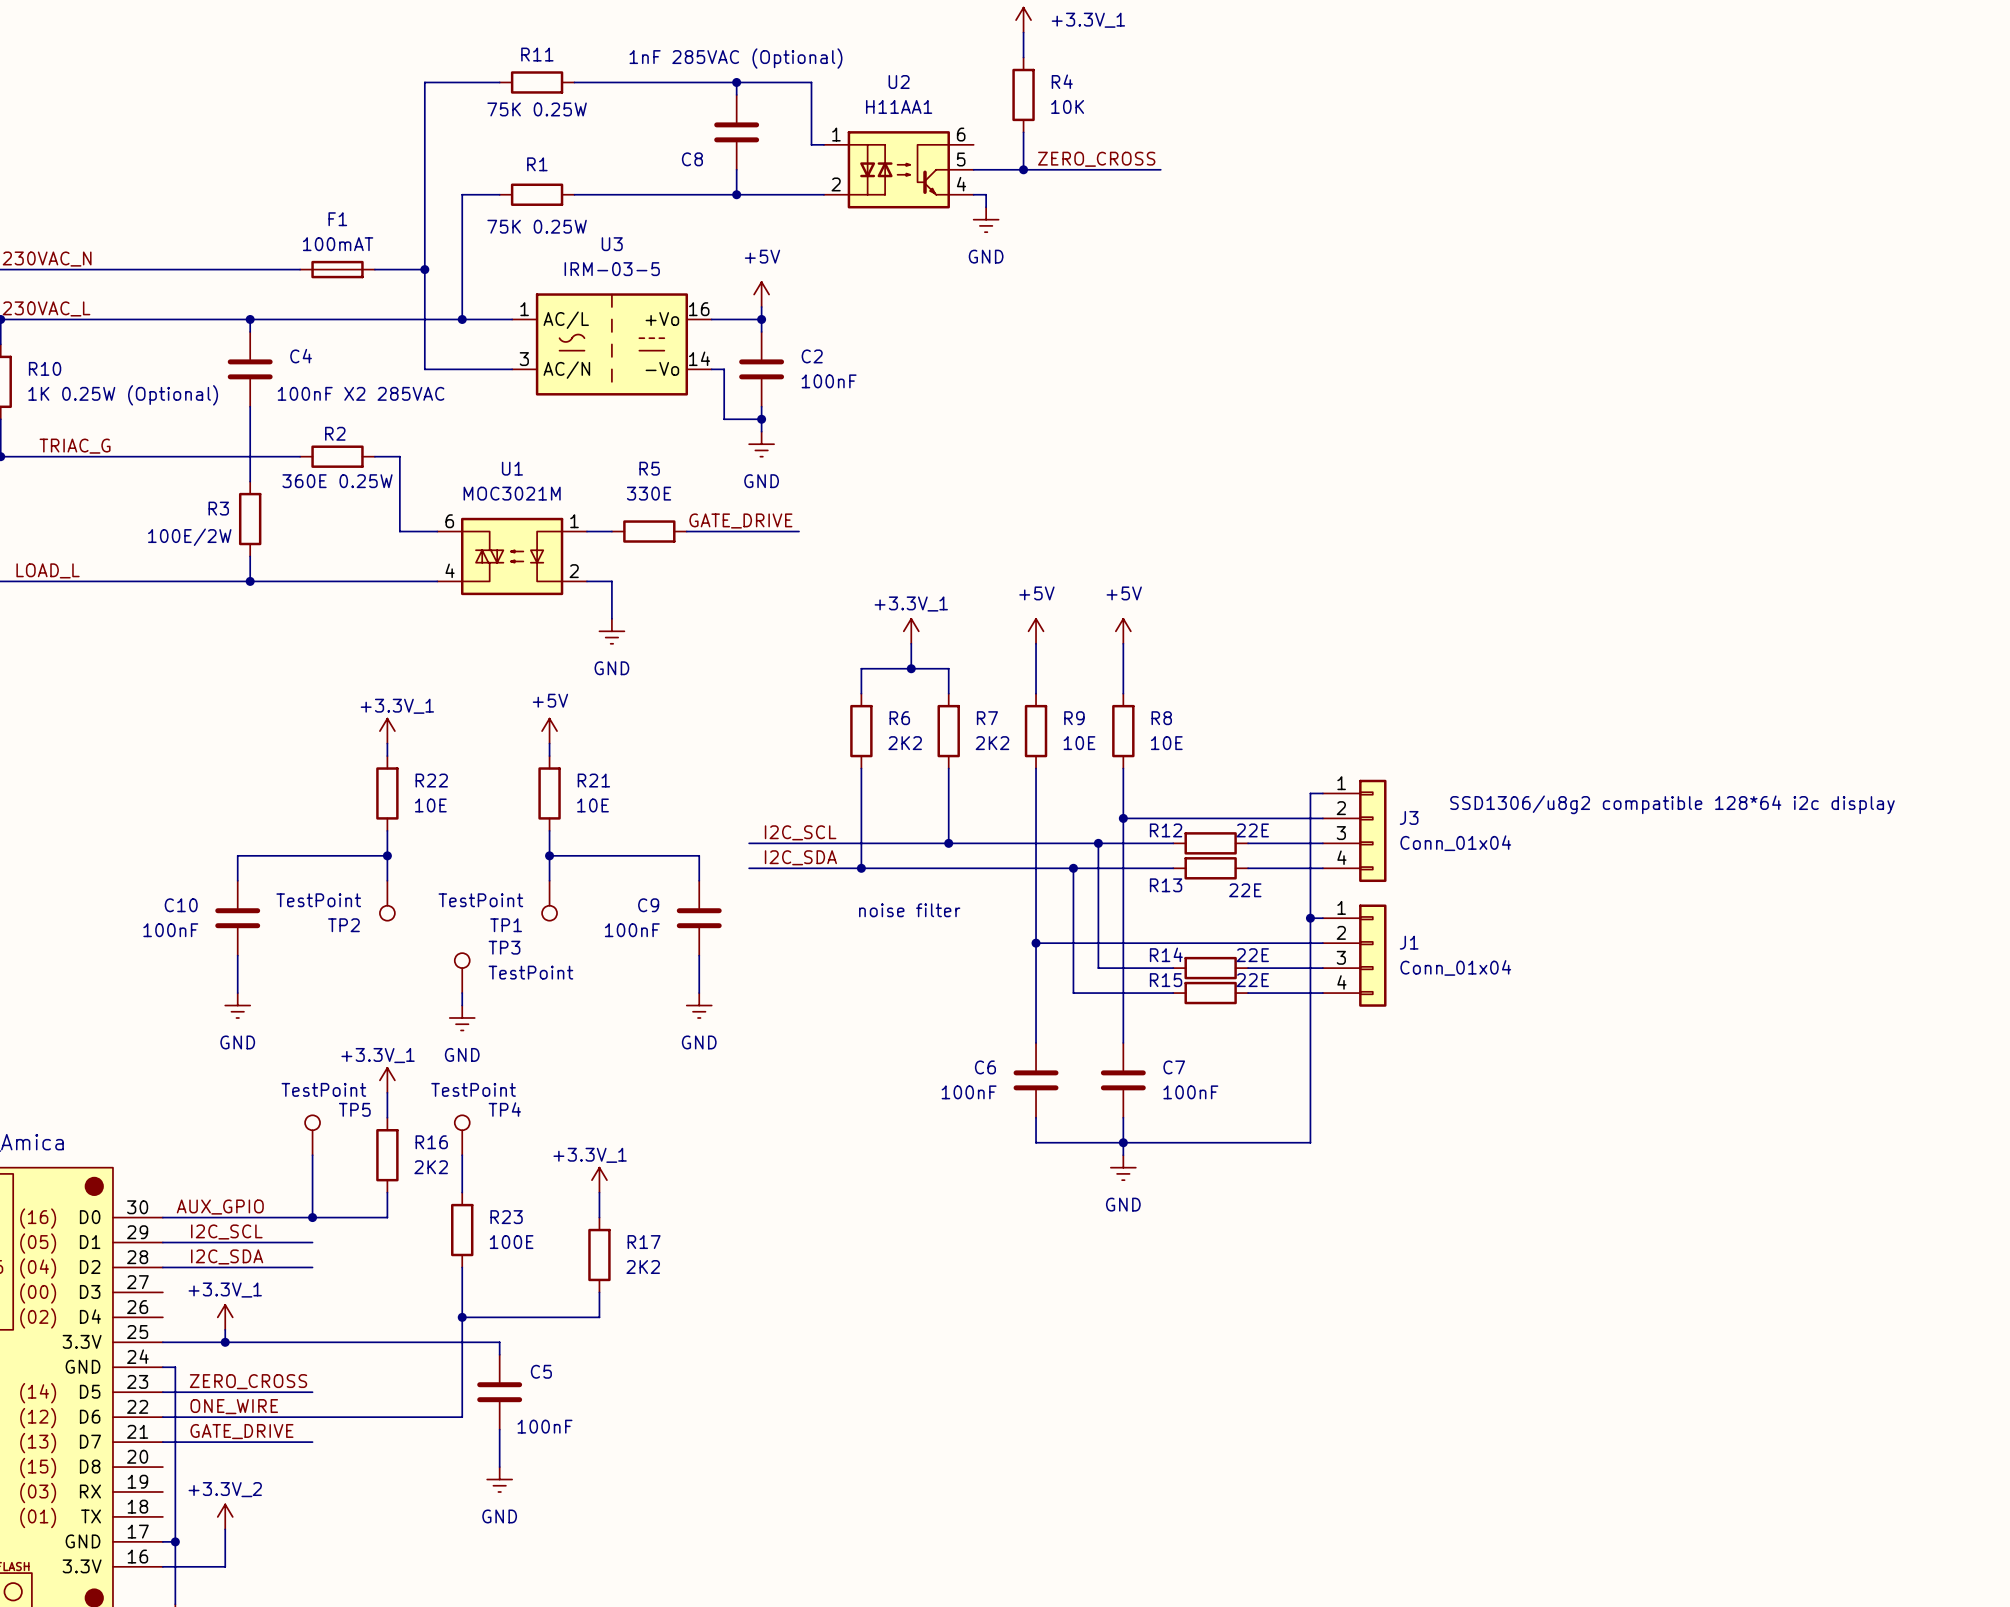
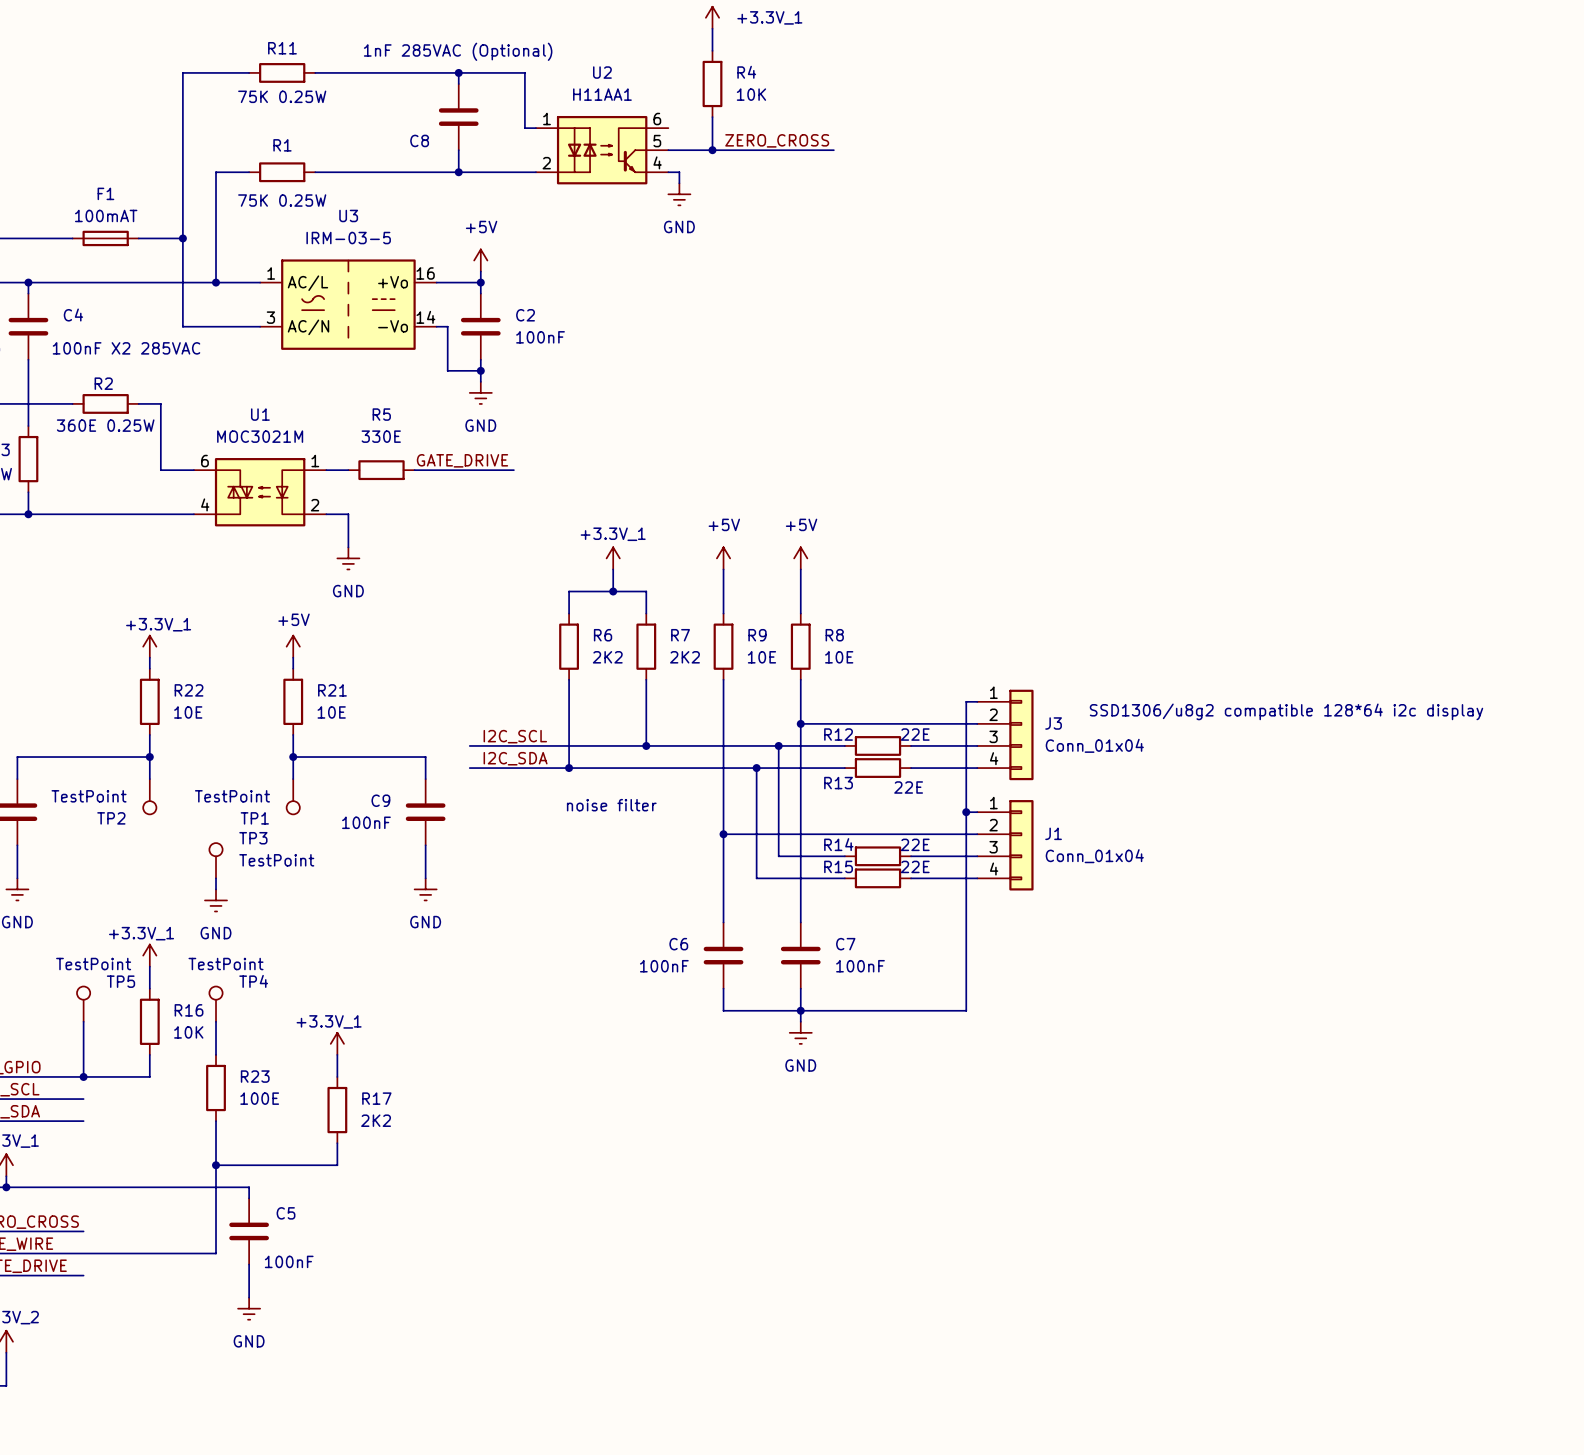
R16 value: 2K2 (431, 1167) -> 10K (188, 1032)

